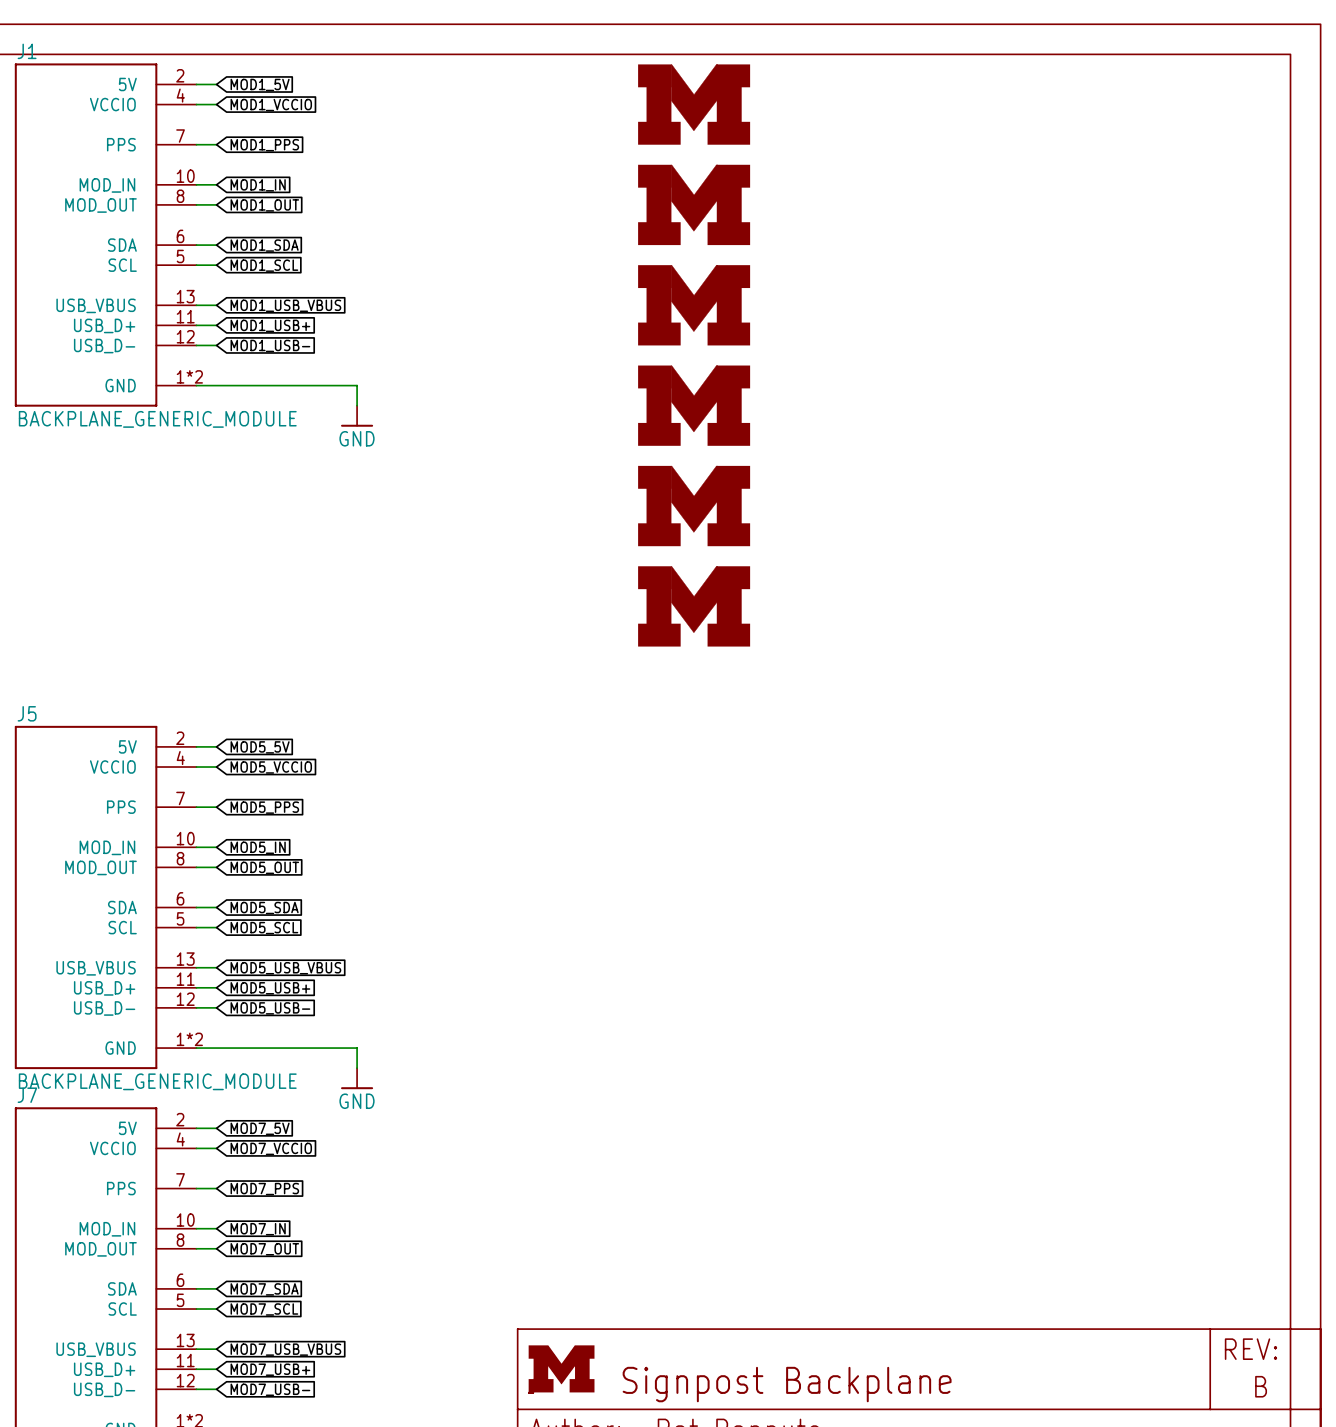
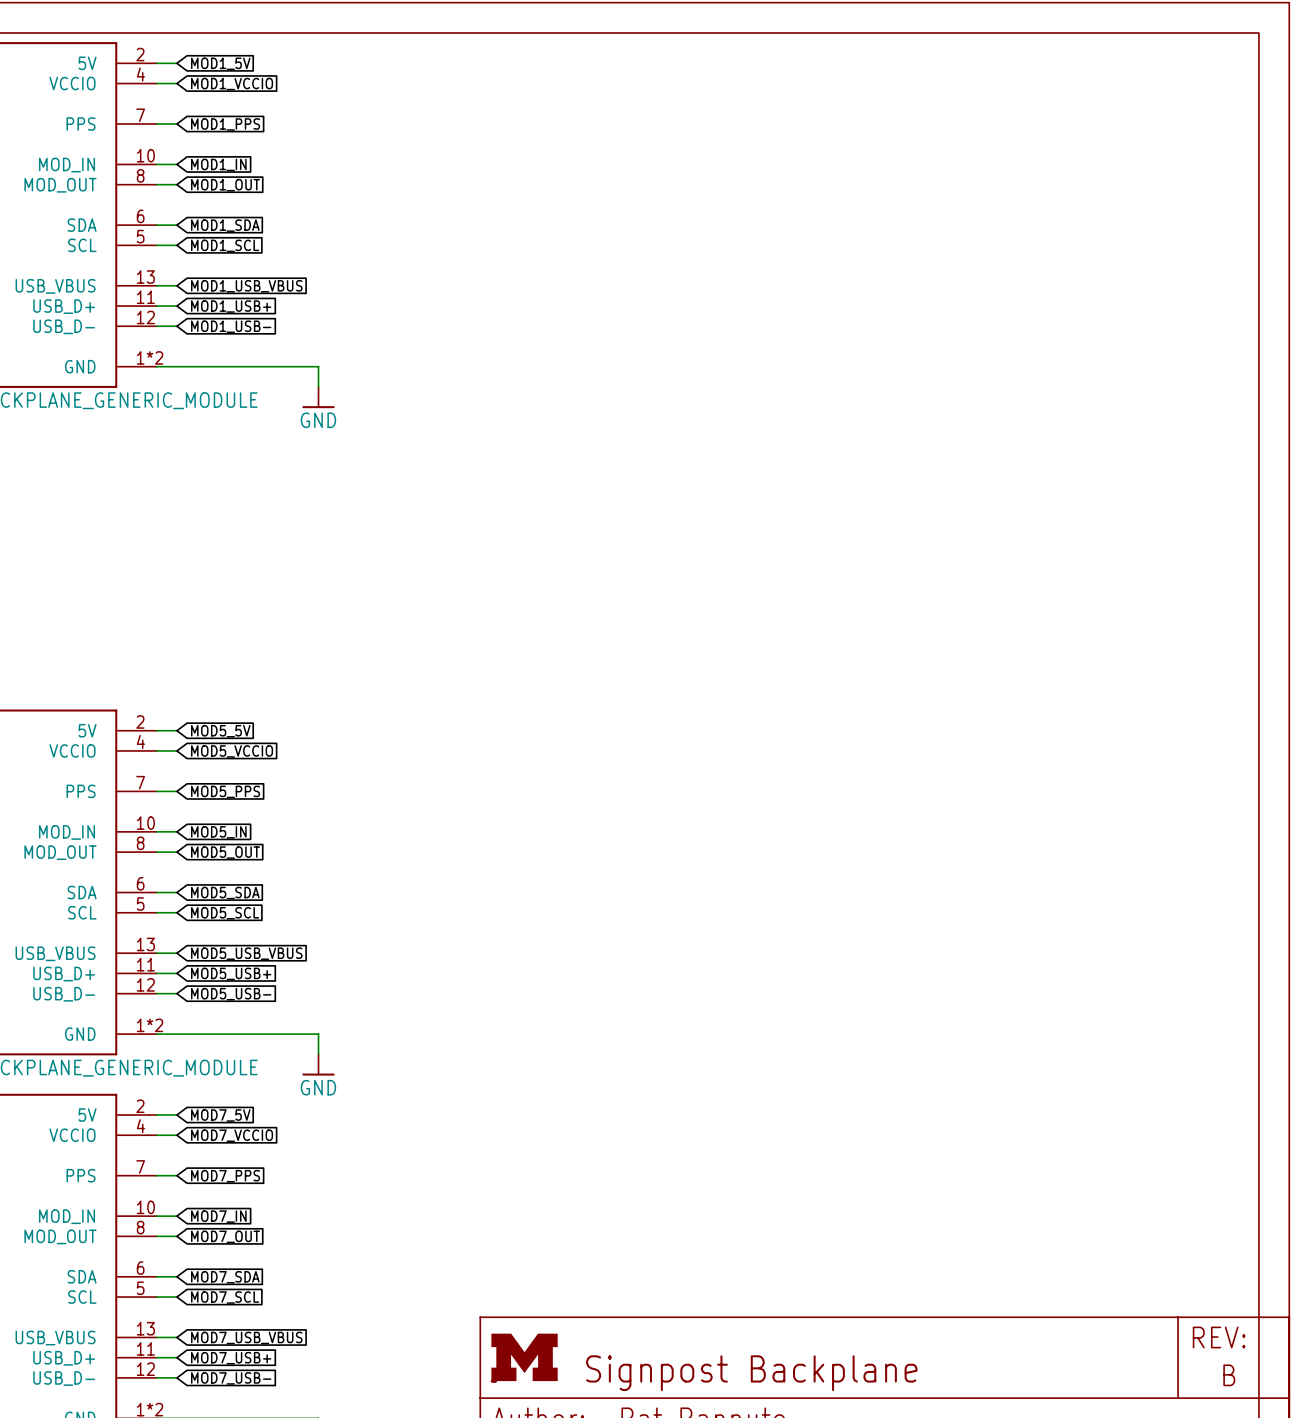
part: (694, 104) -> none
part: (694, 204) -> none
part: (694, 305) -> none
part: (694, 405) -> none
part: (694, 506) -> none
part: (694, 606) -> none

